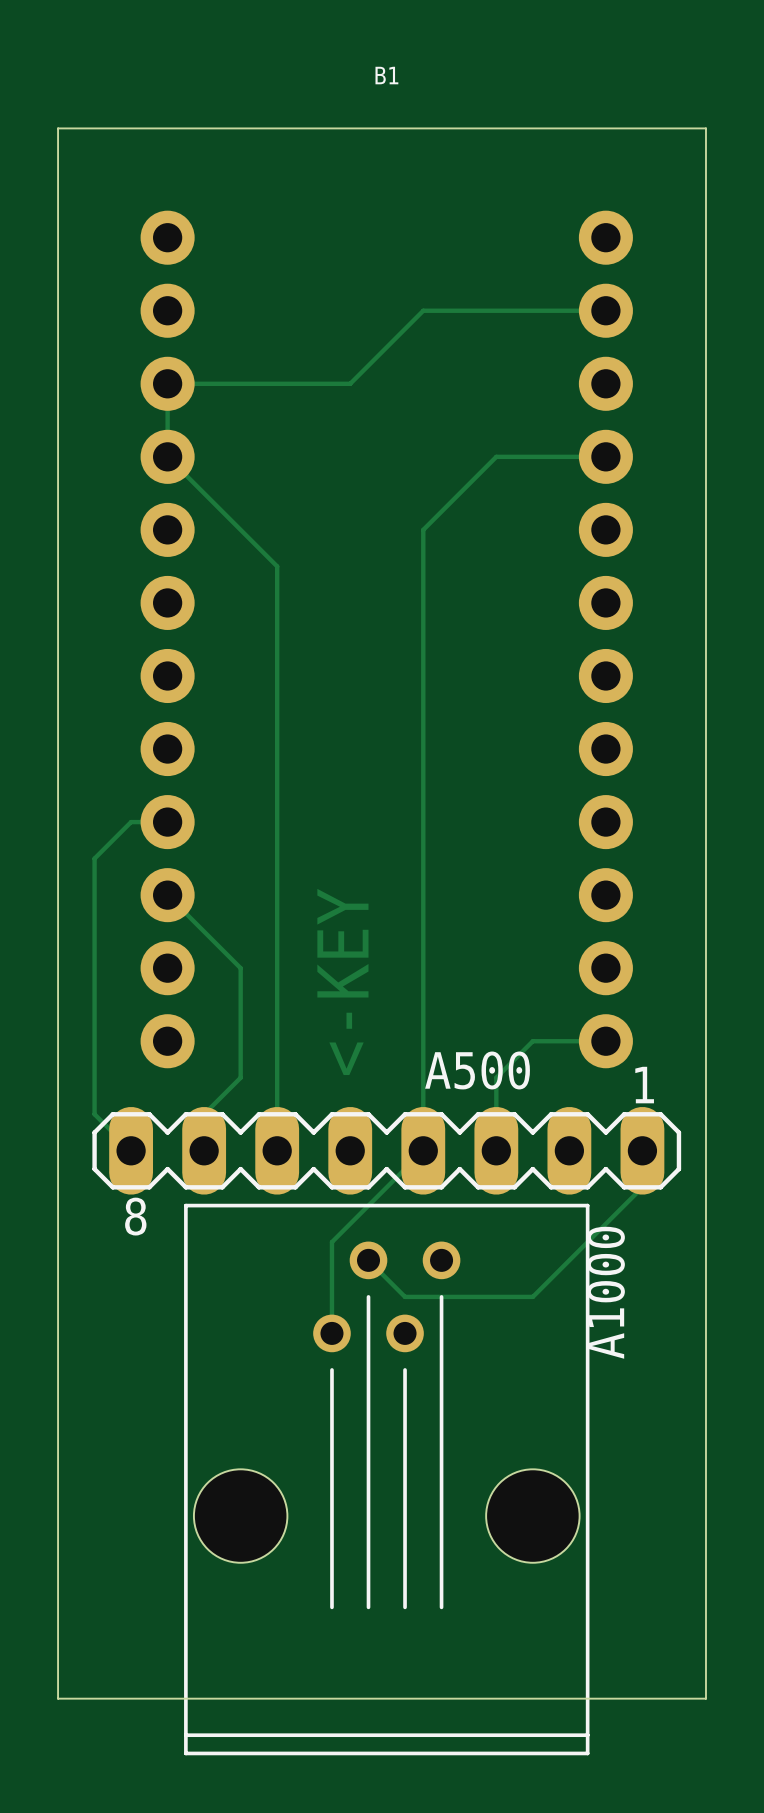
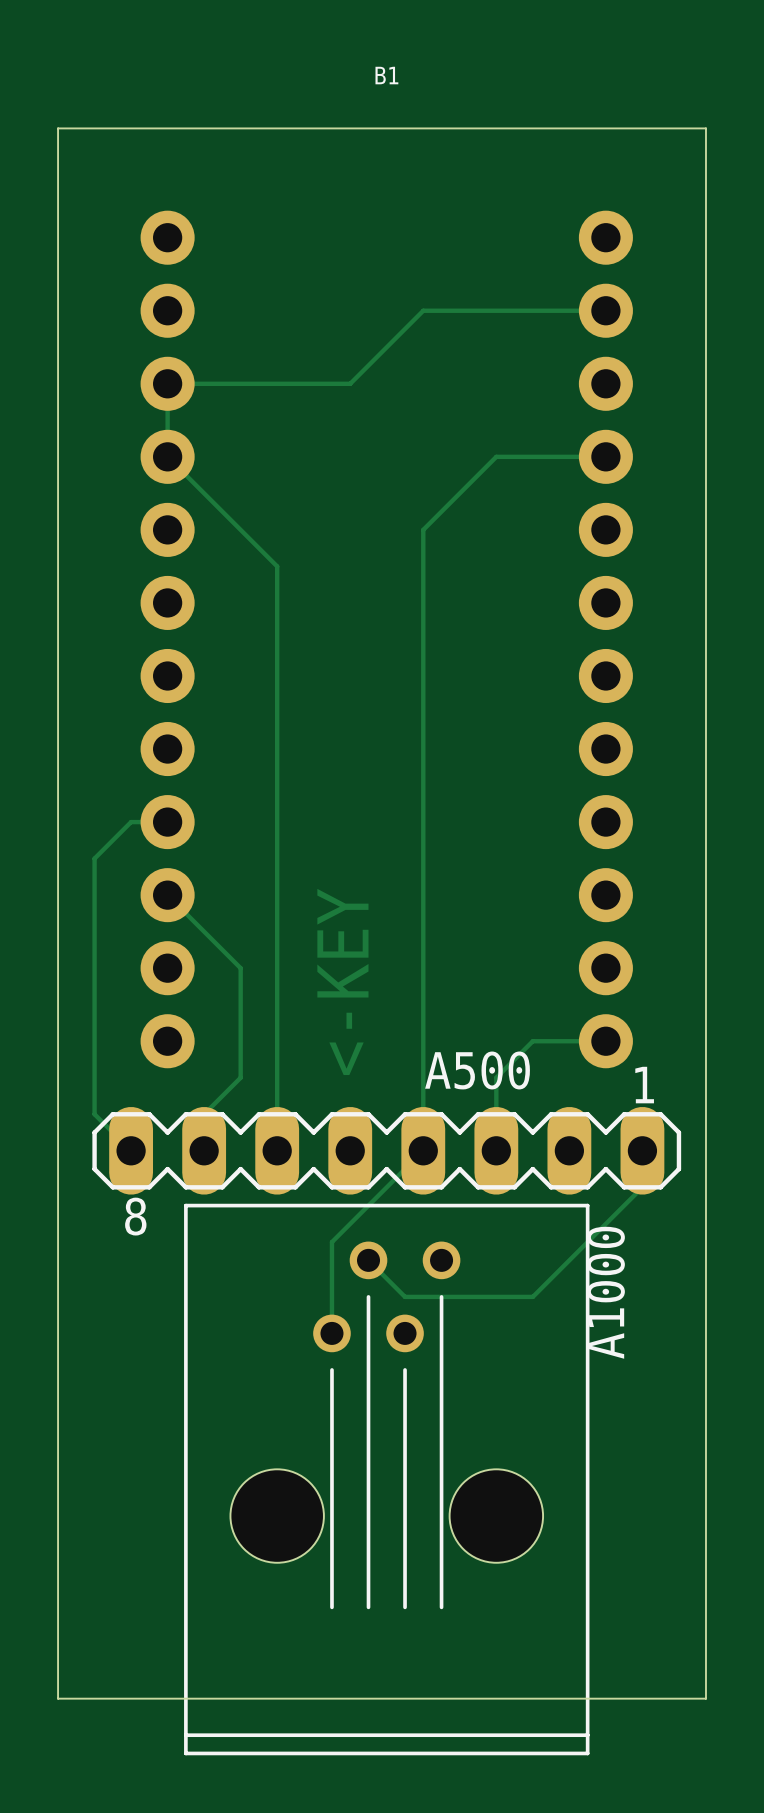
A1000 footprint: [184, 1203, 590, 1756] -> [184, 1203, 590, 1756]

